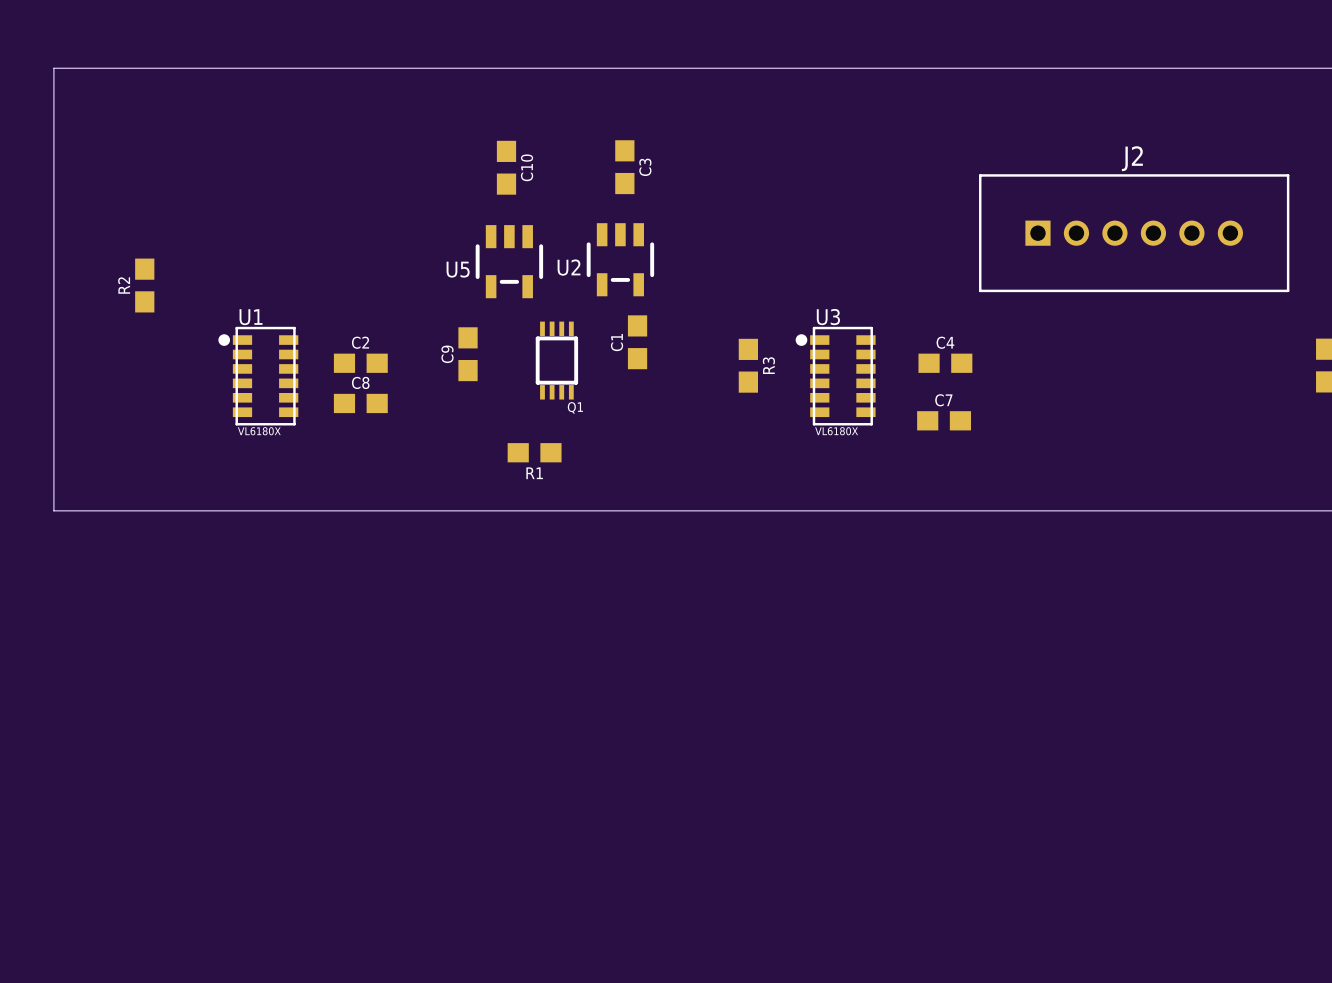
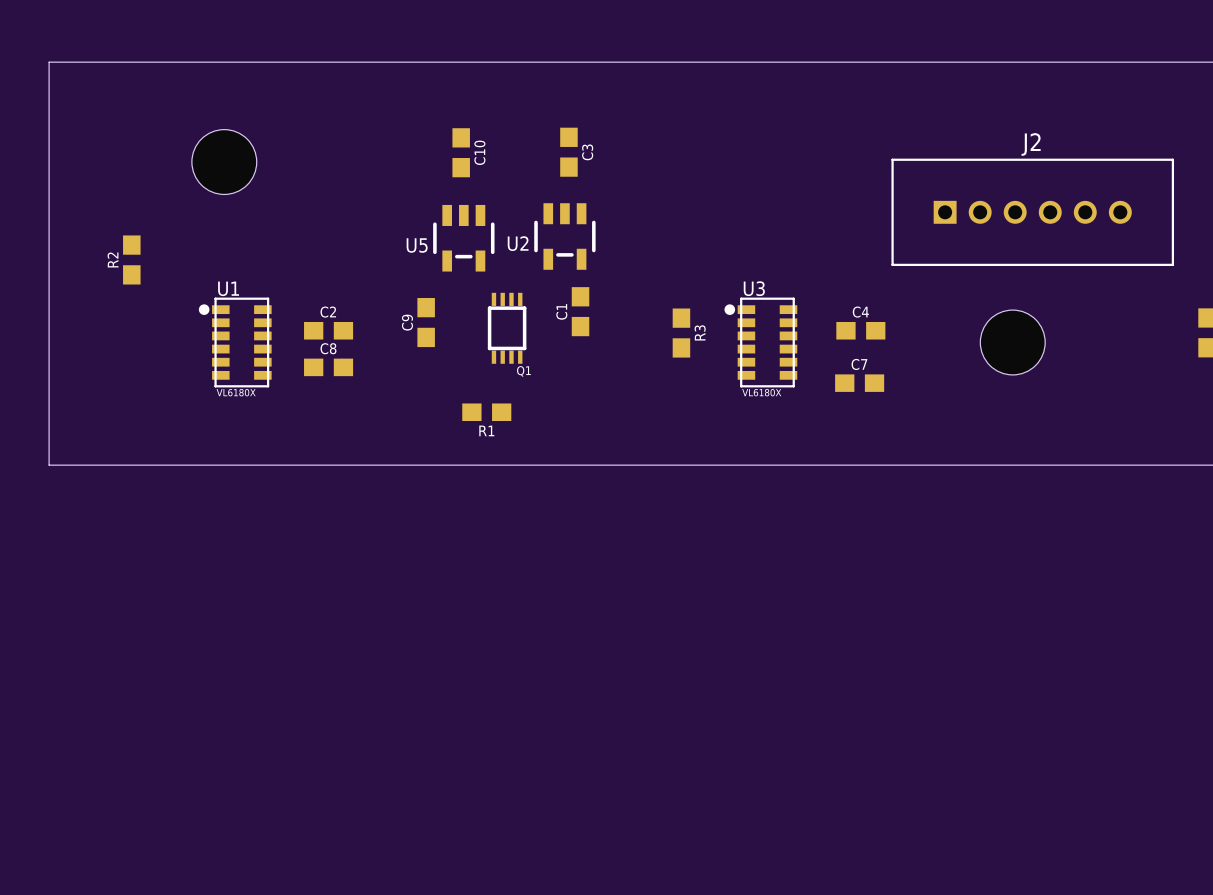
hole: none -> (224, 162)
hole: none -> (1012, 342)

